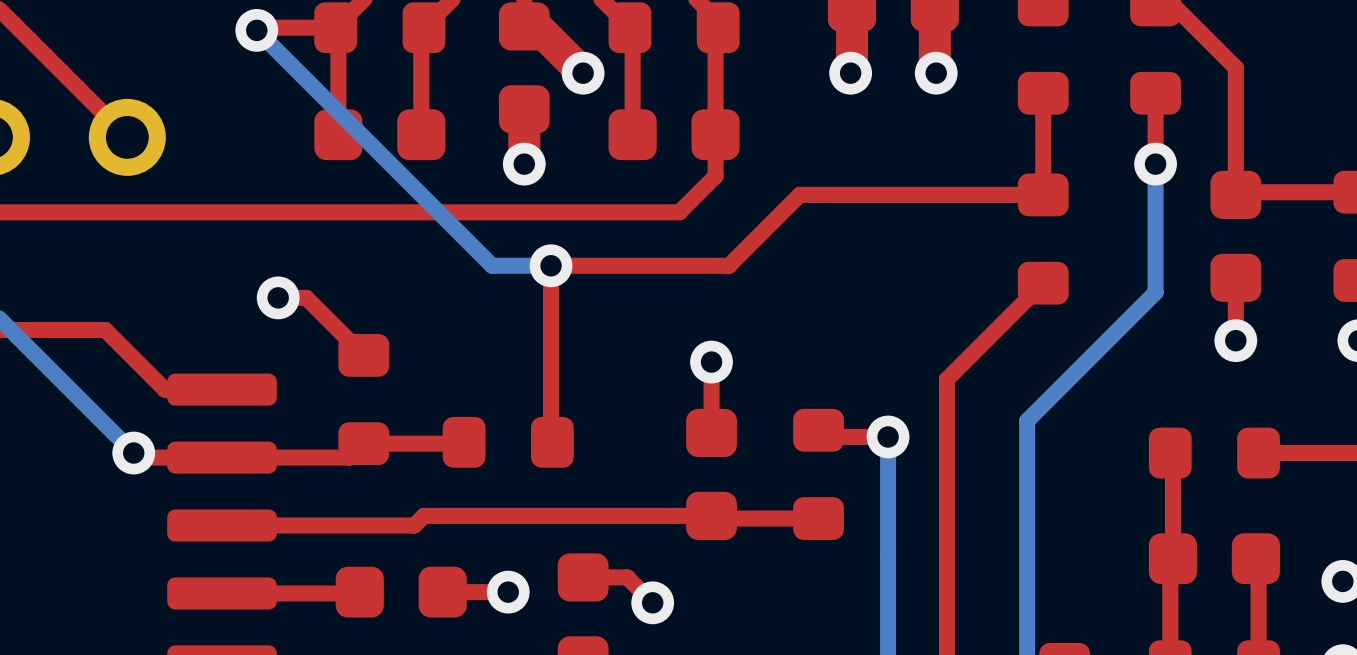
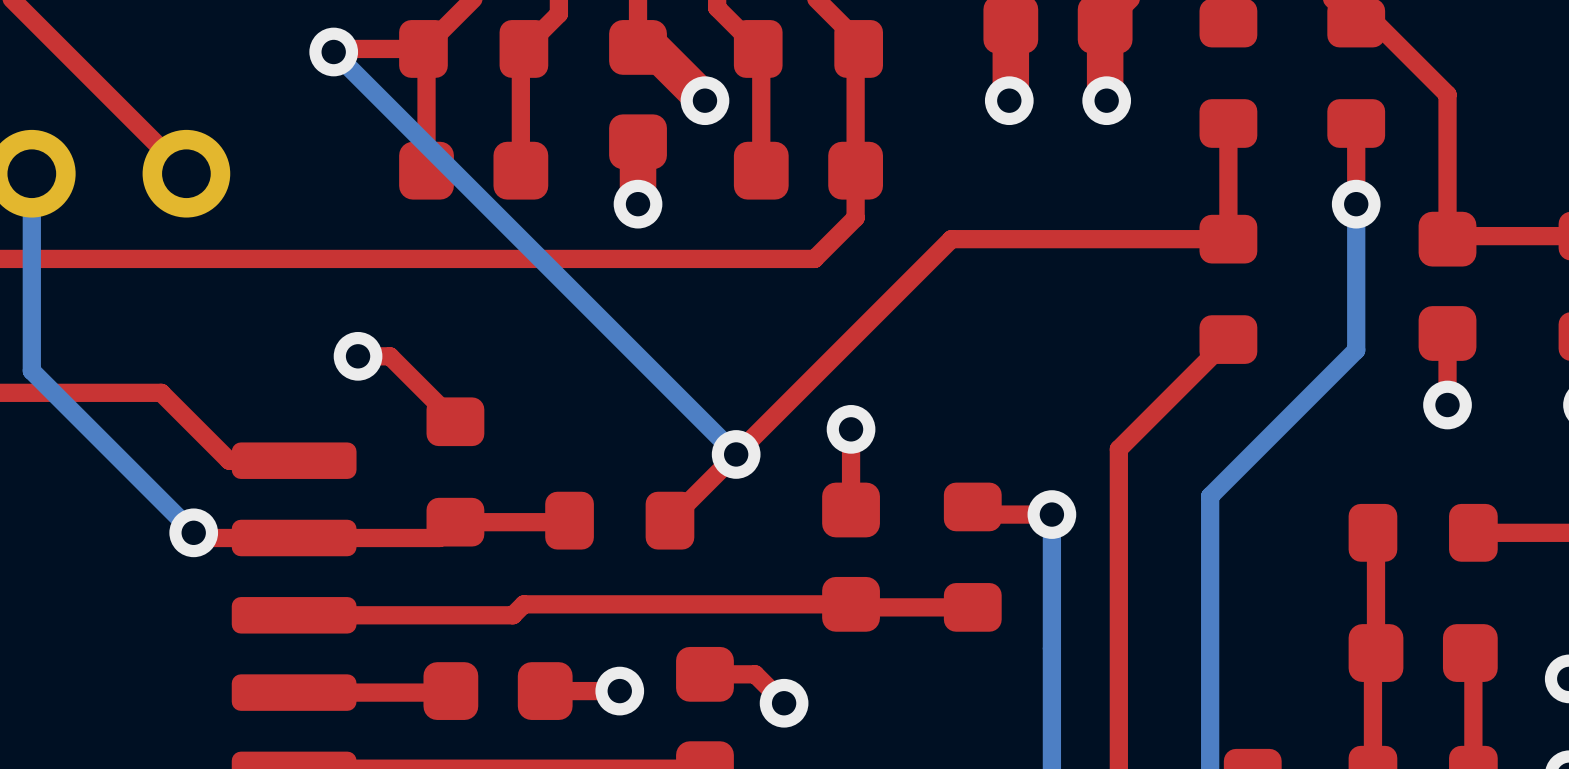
bottom track: (551, 265) (492, 265) -> (736, 454) (601, 319)
via position: (551, 265) -> (736, 454)
top track: (728, 265) (551, 265) (552, 442) -> (870, 319) (669, 520)

